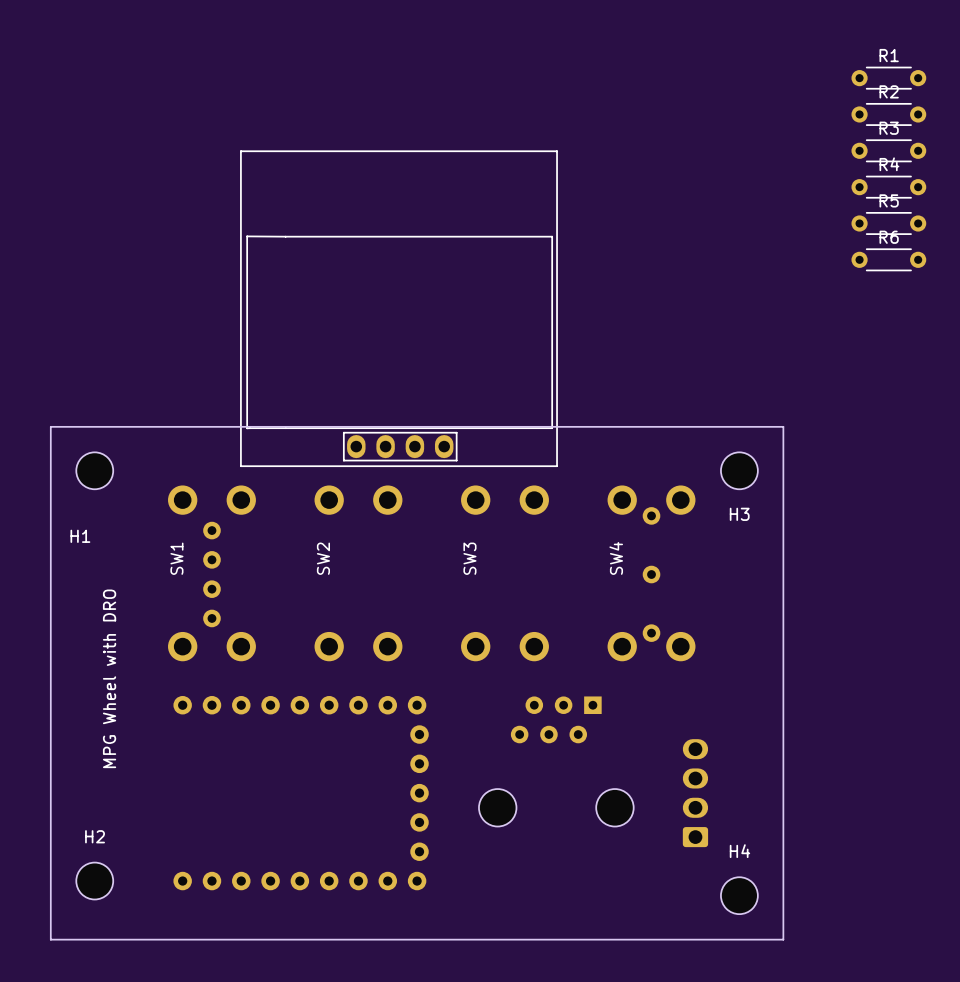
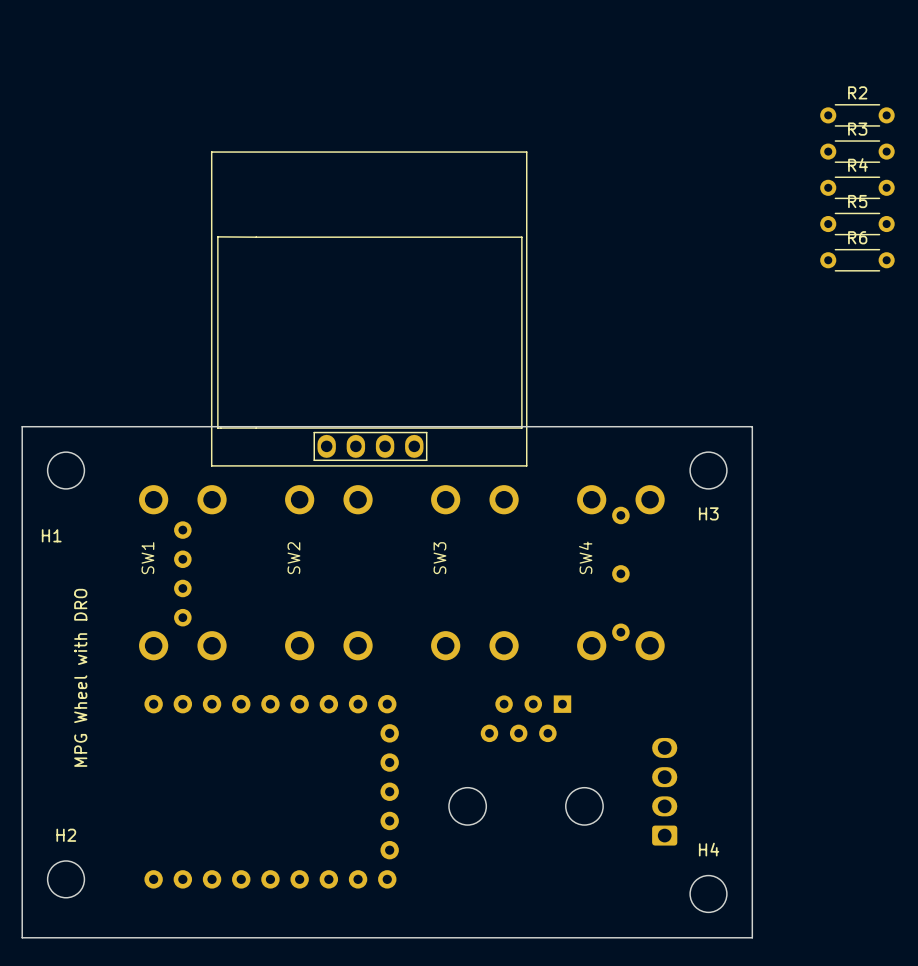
R1: (888, 78) -> none

